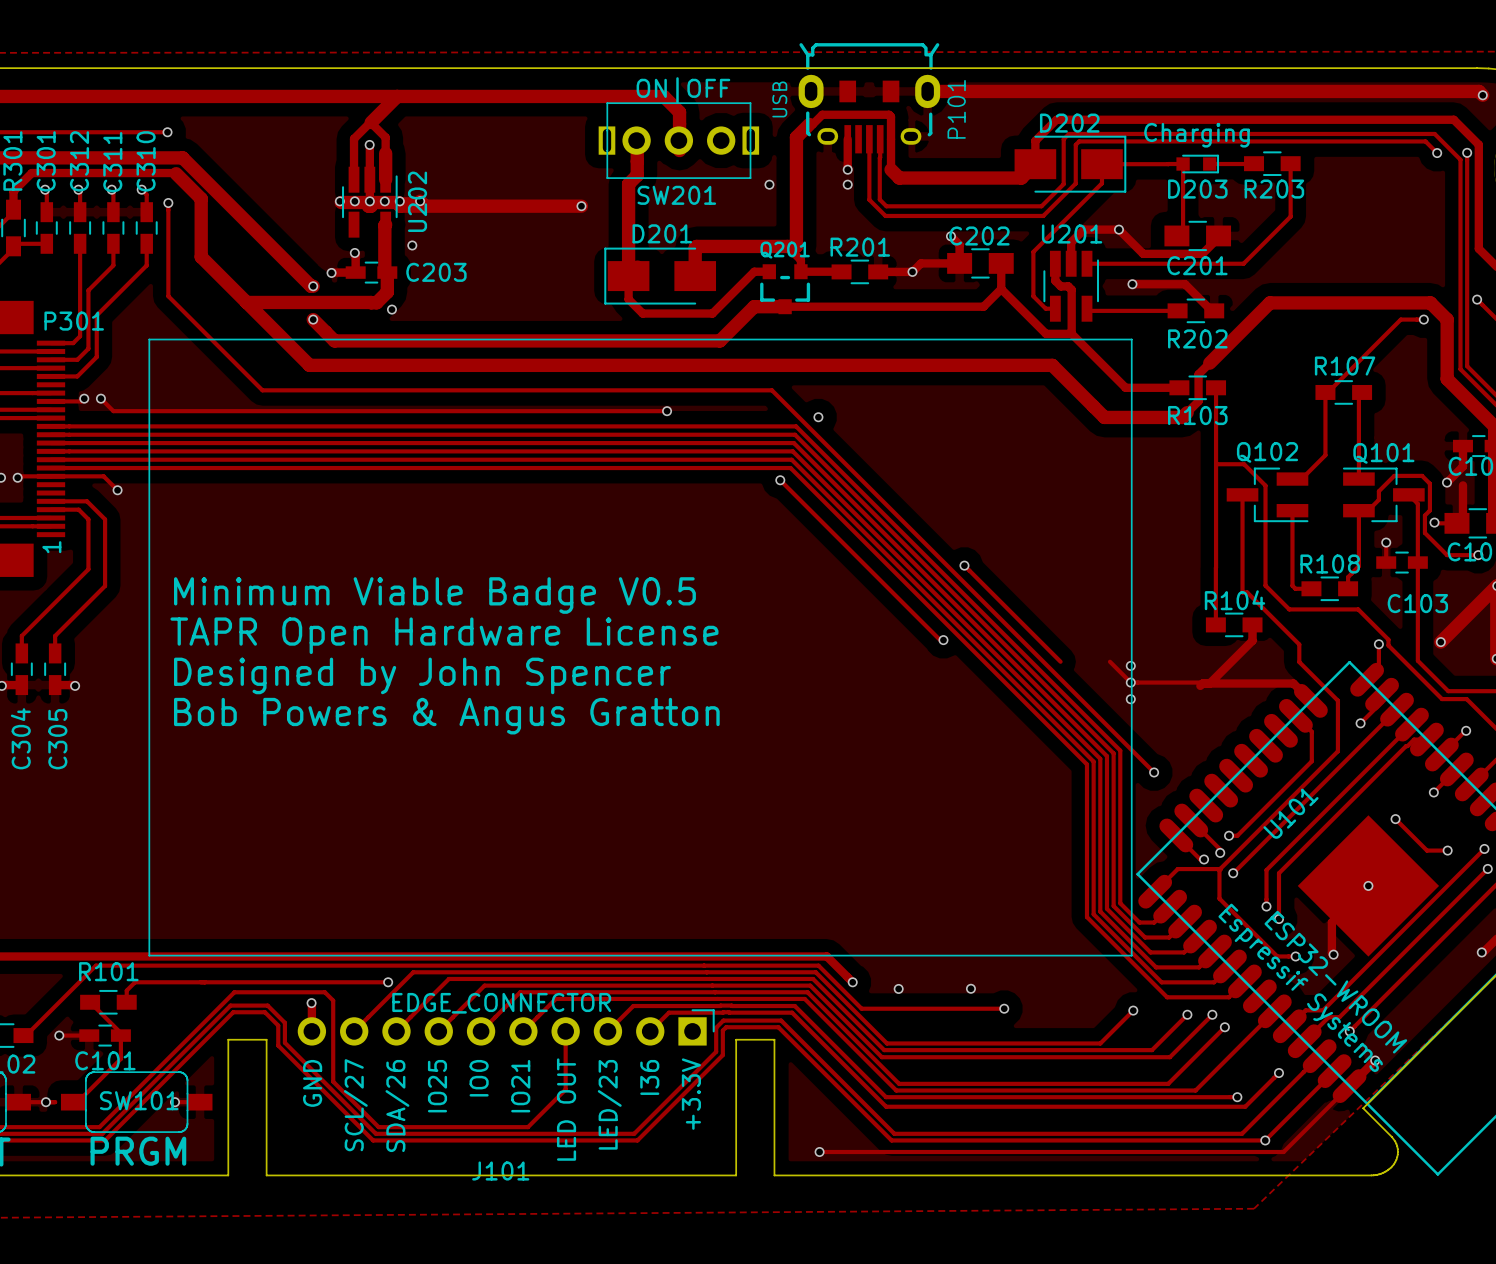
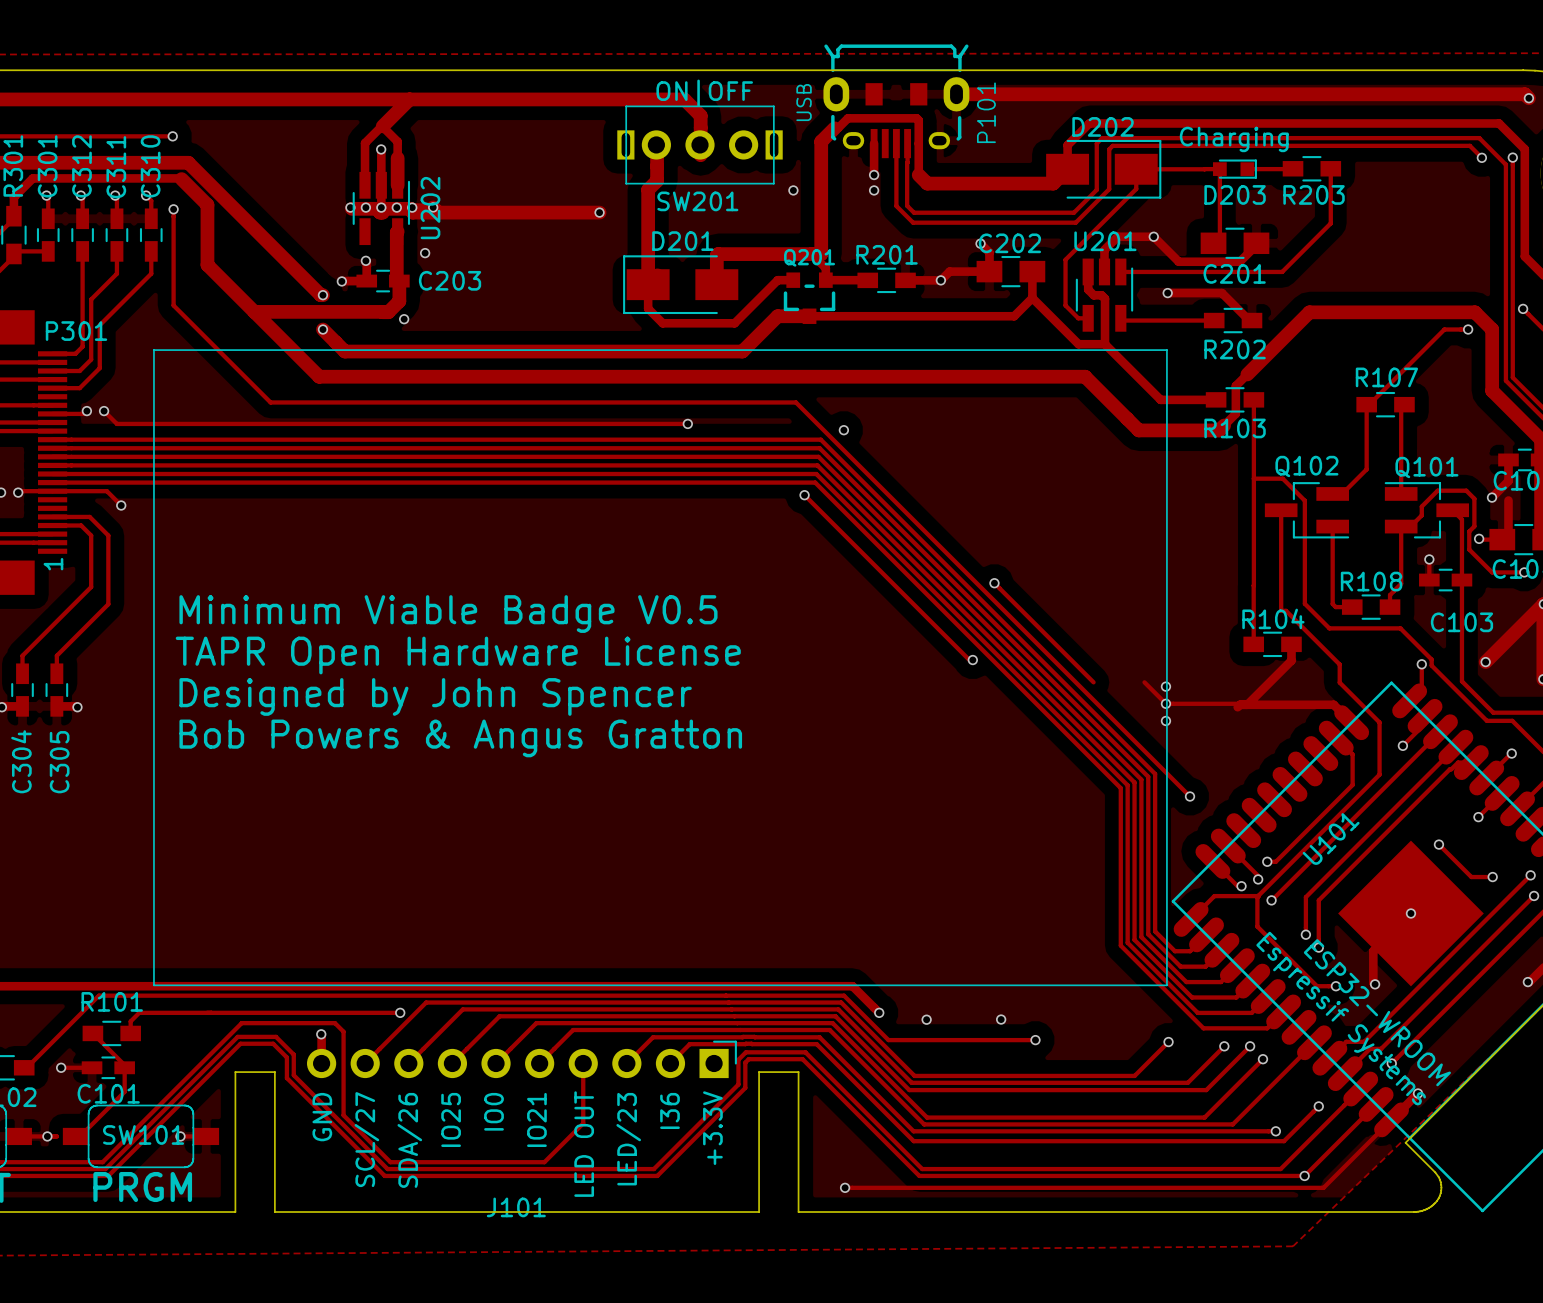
J101 value: EDGE_CONNECTOR (501, 1003) -> none

